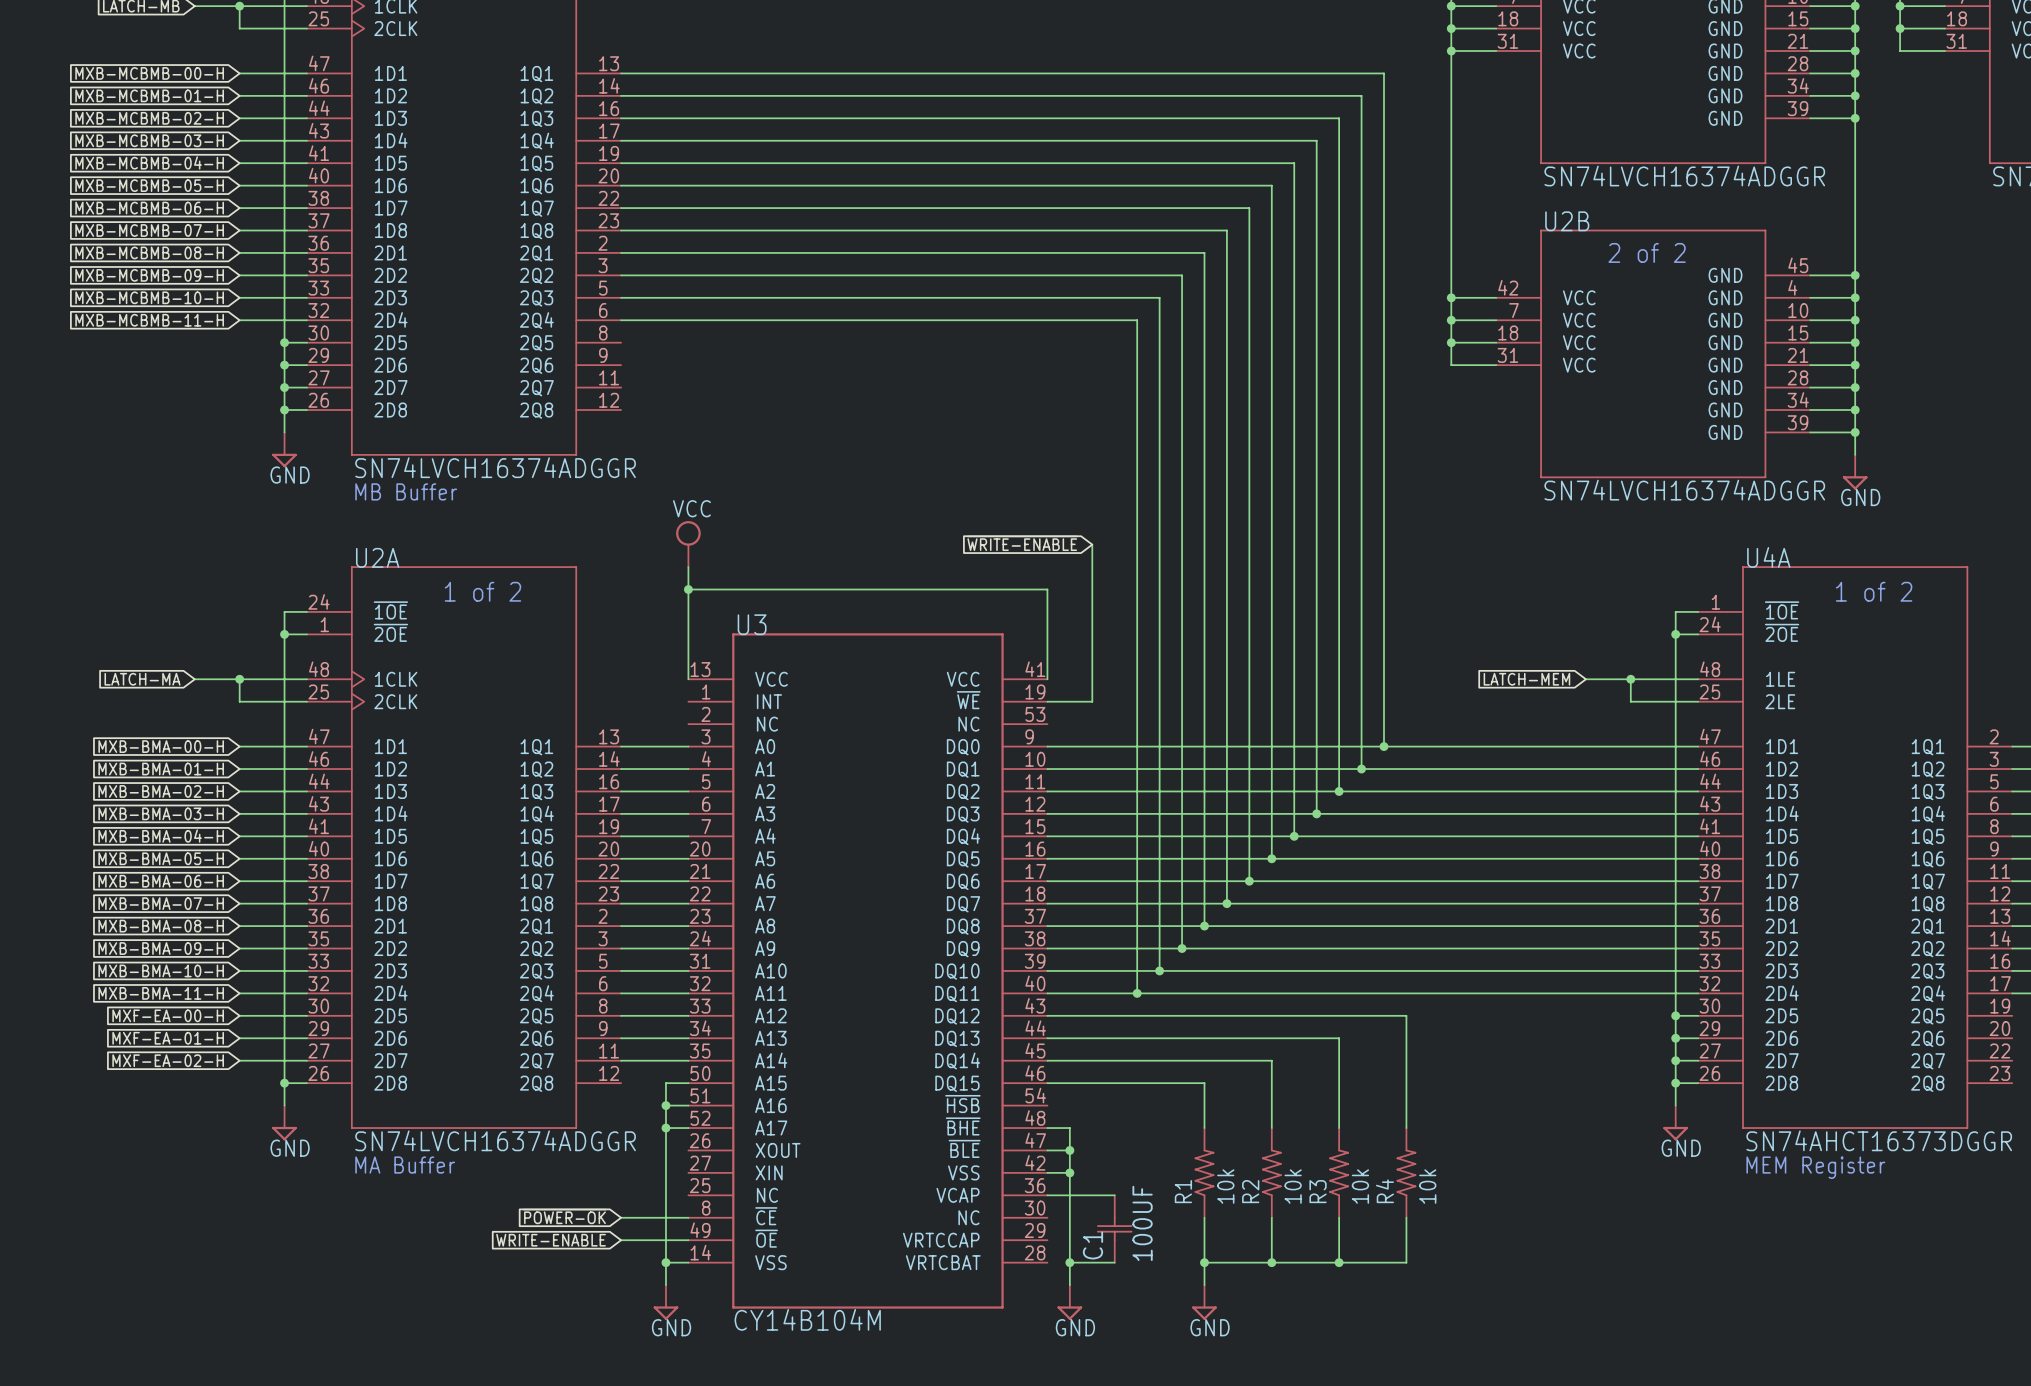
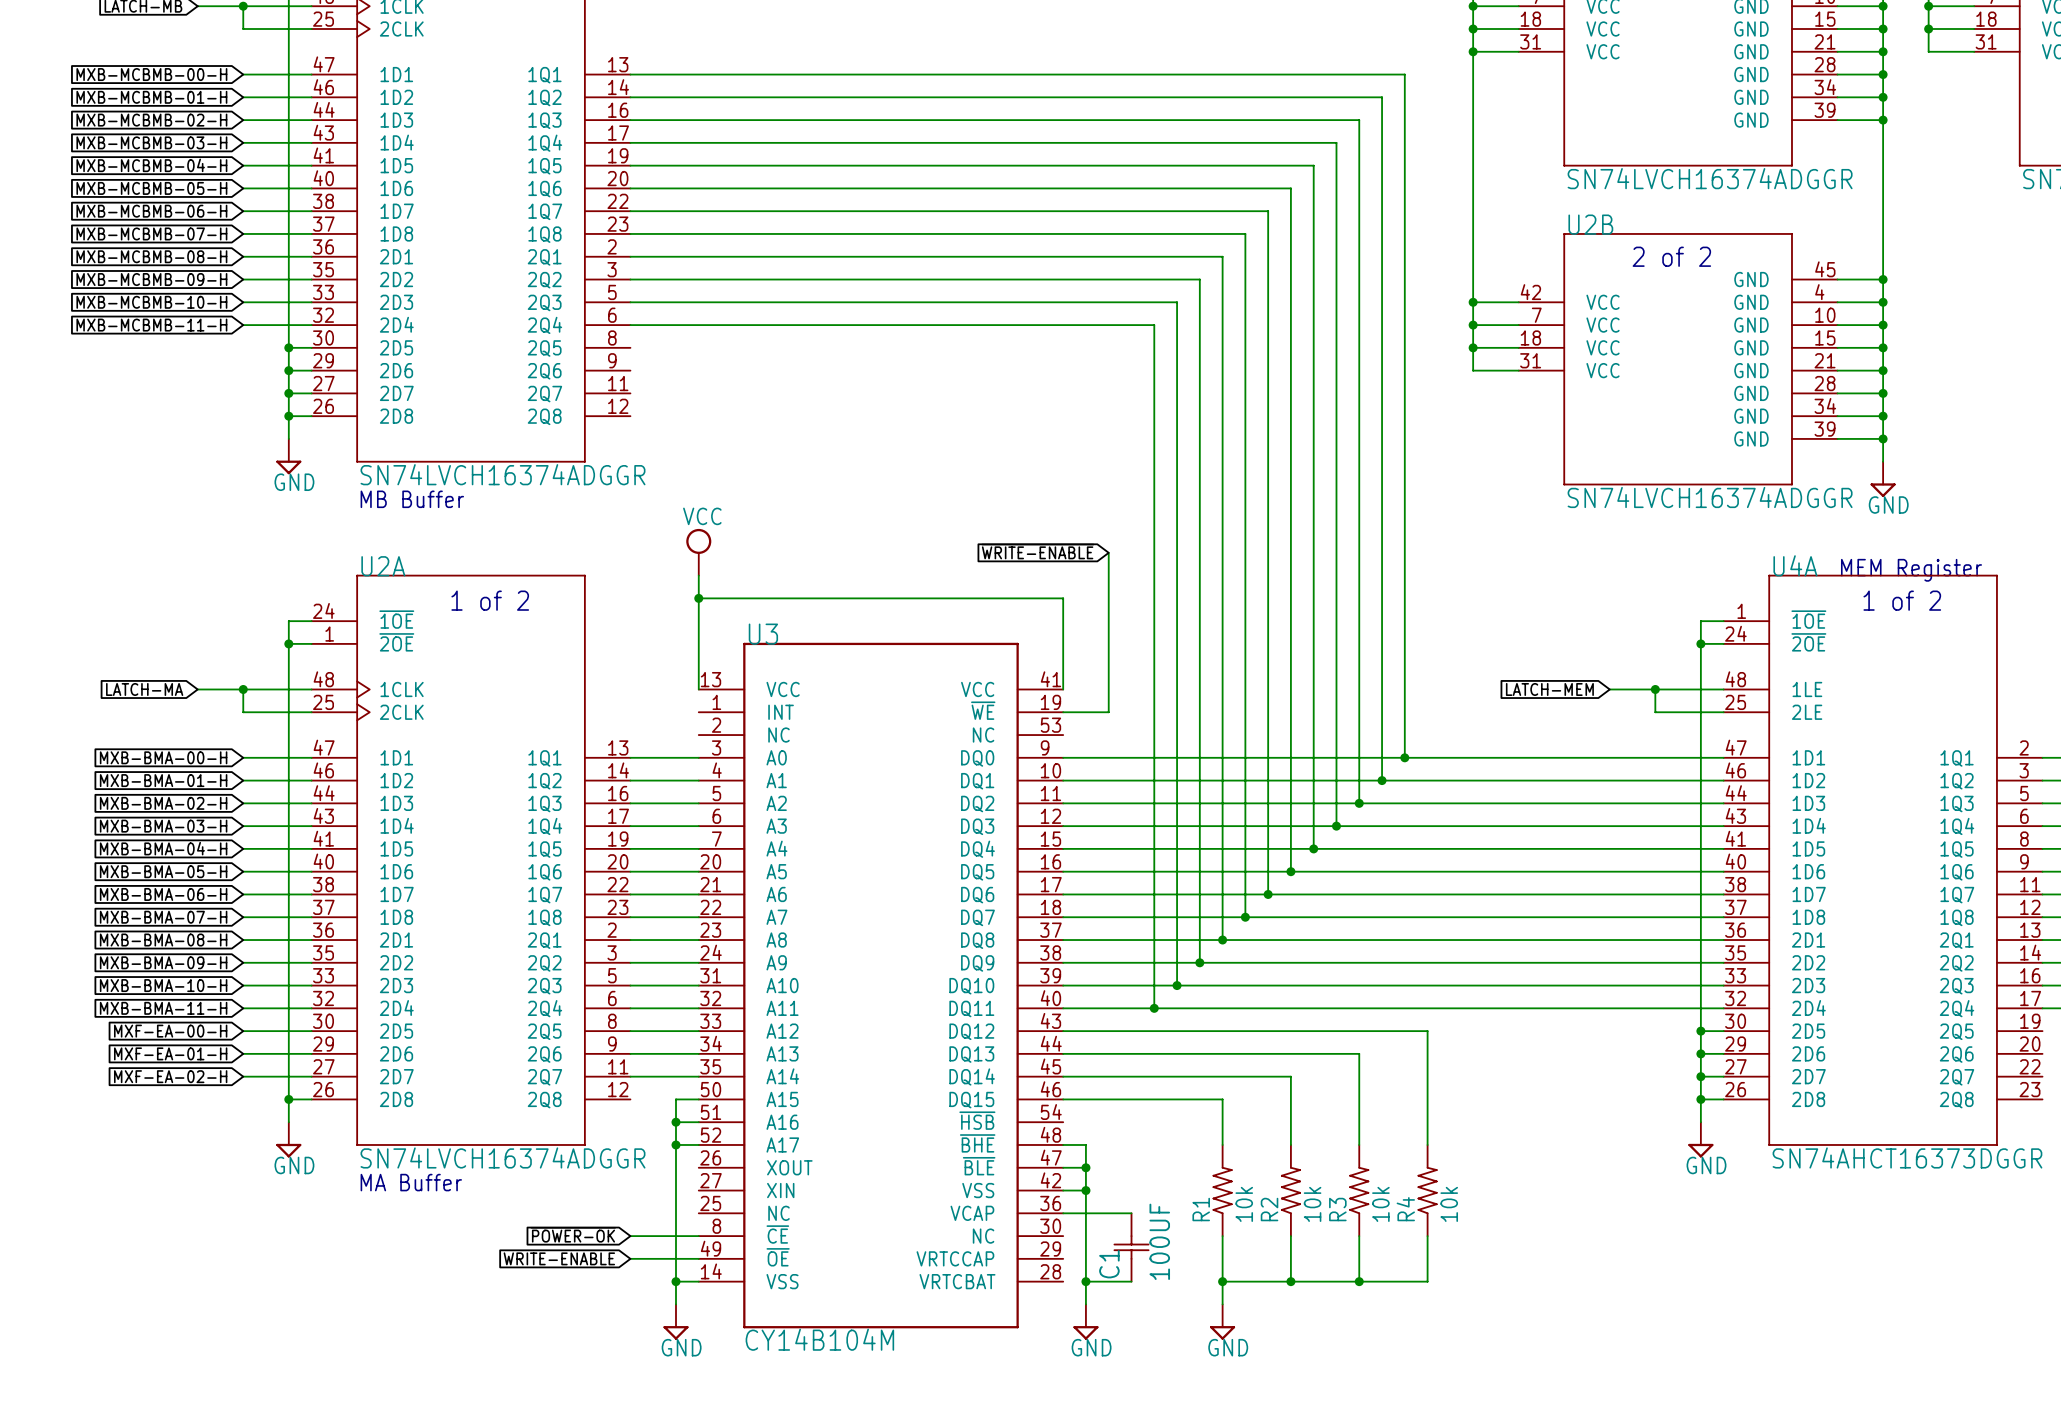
text: none -> MEM Register (1911, 570)
text: MEM Register (1815, 1167) -> none

